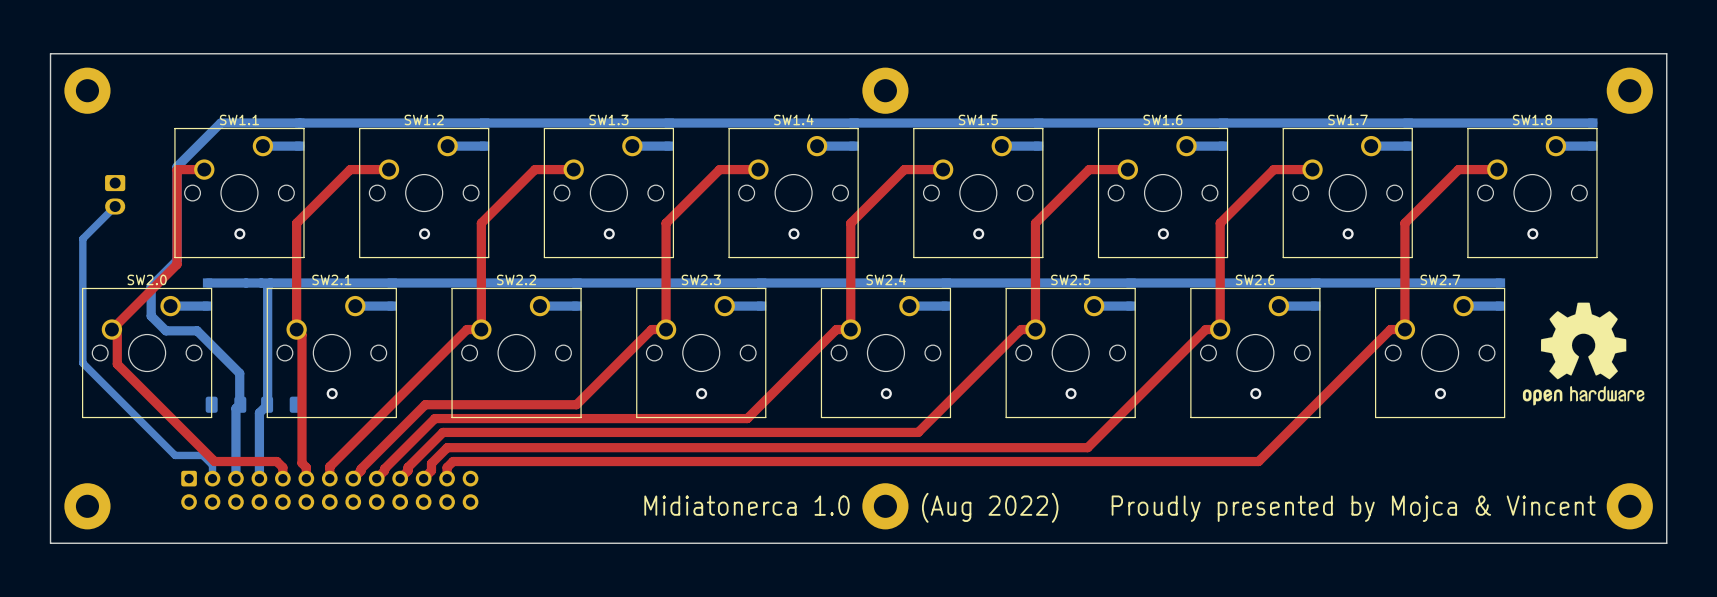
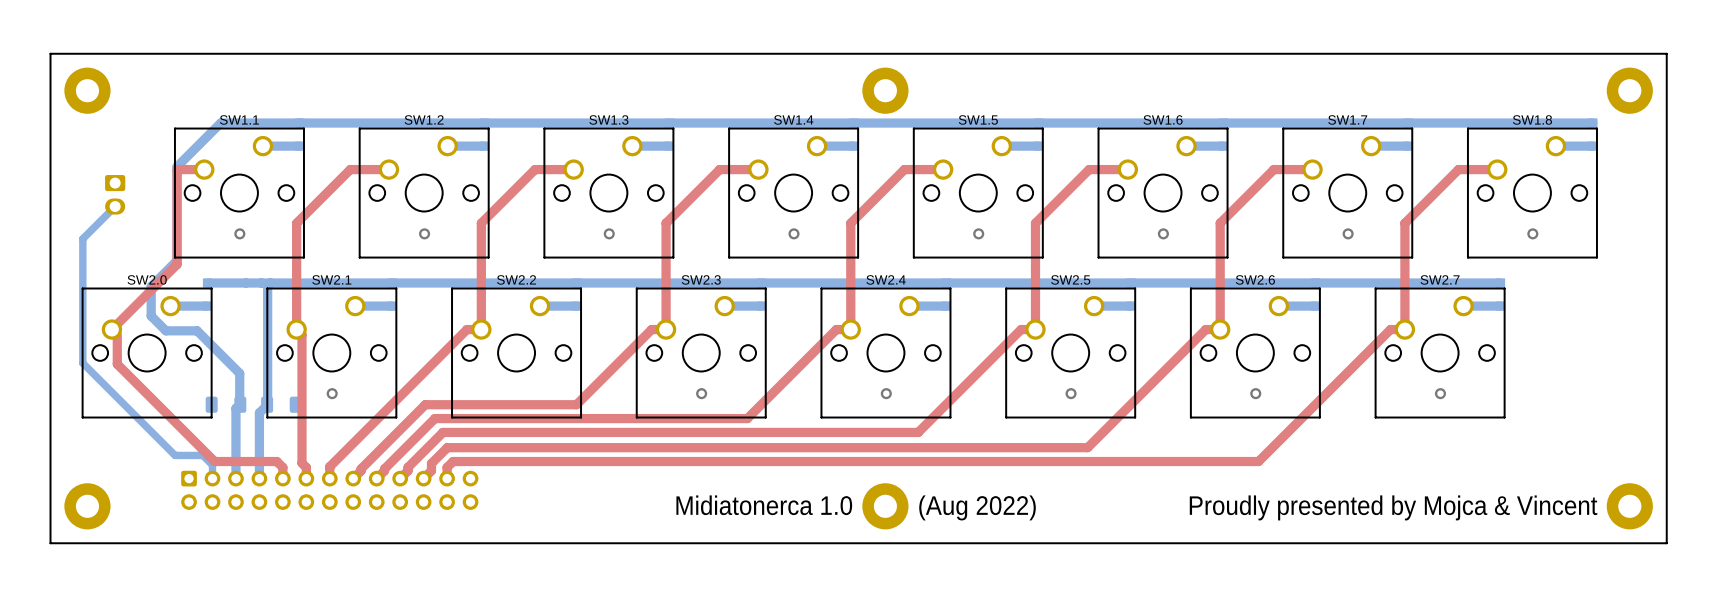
drawing: [1522, 302, 1645, 406] -> none

